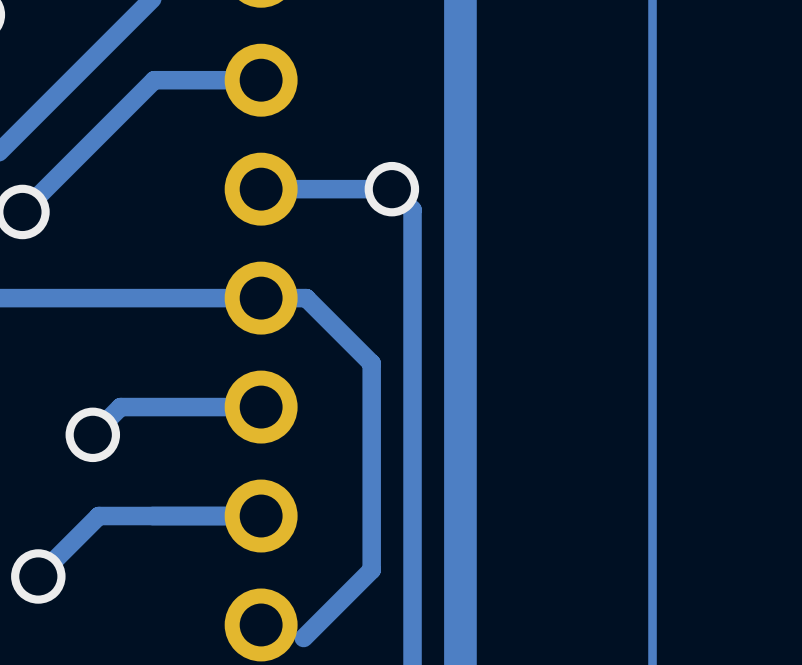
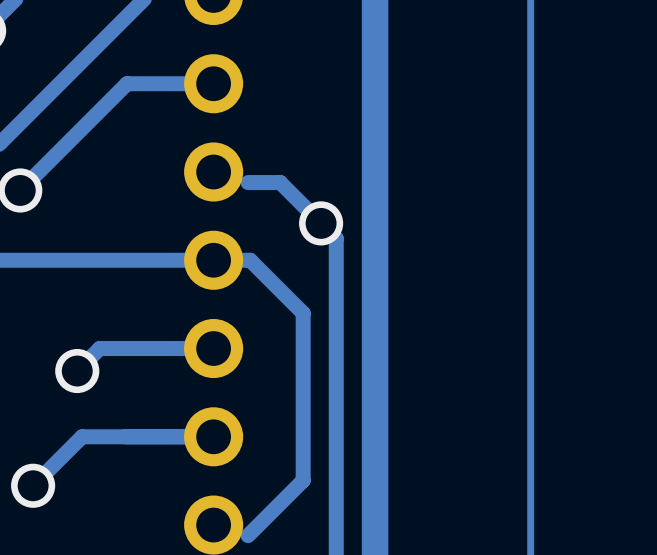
track: (261, 189) (391, 189) (412, 209) (412, 271) -> (248, 182) (280, 182) (336, 238)
via position: (391, 189) -> (321, 223)

